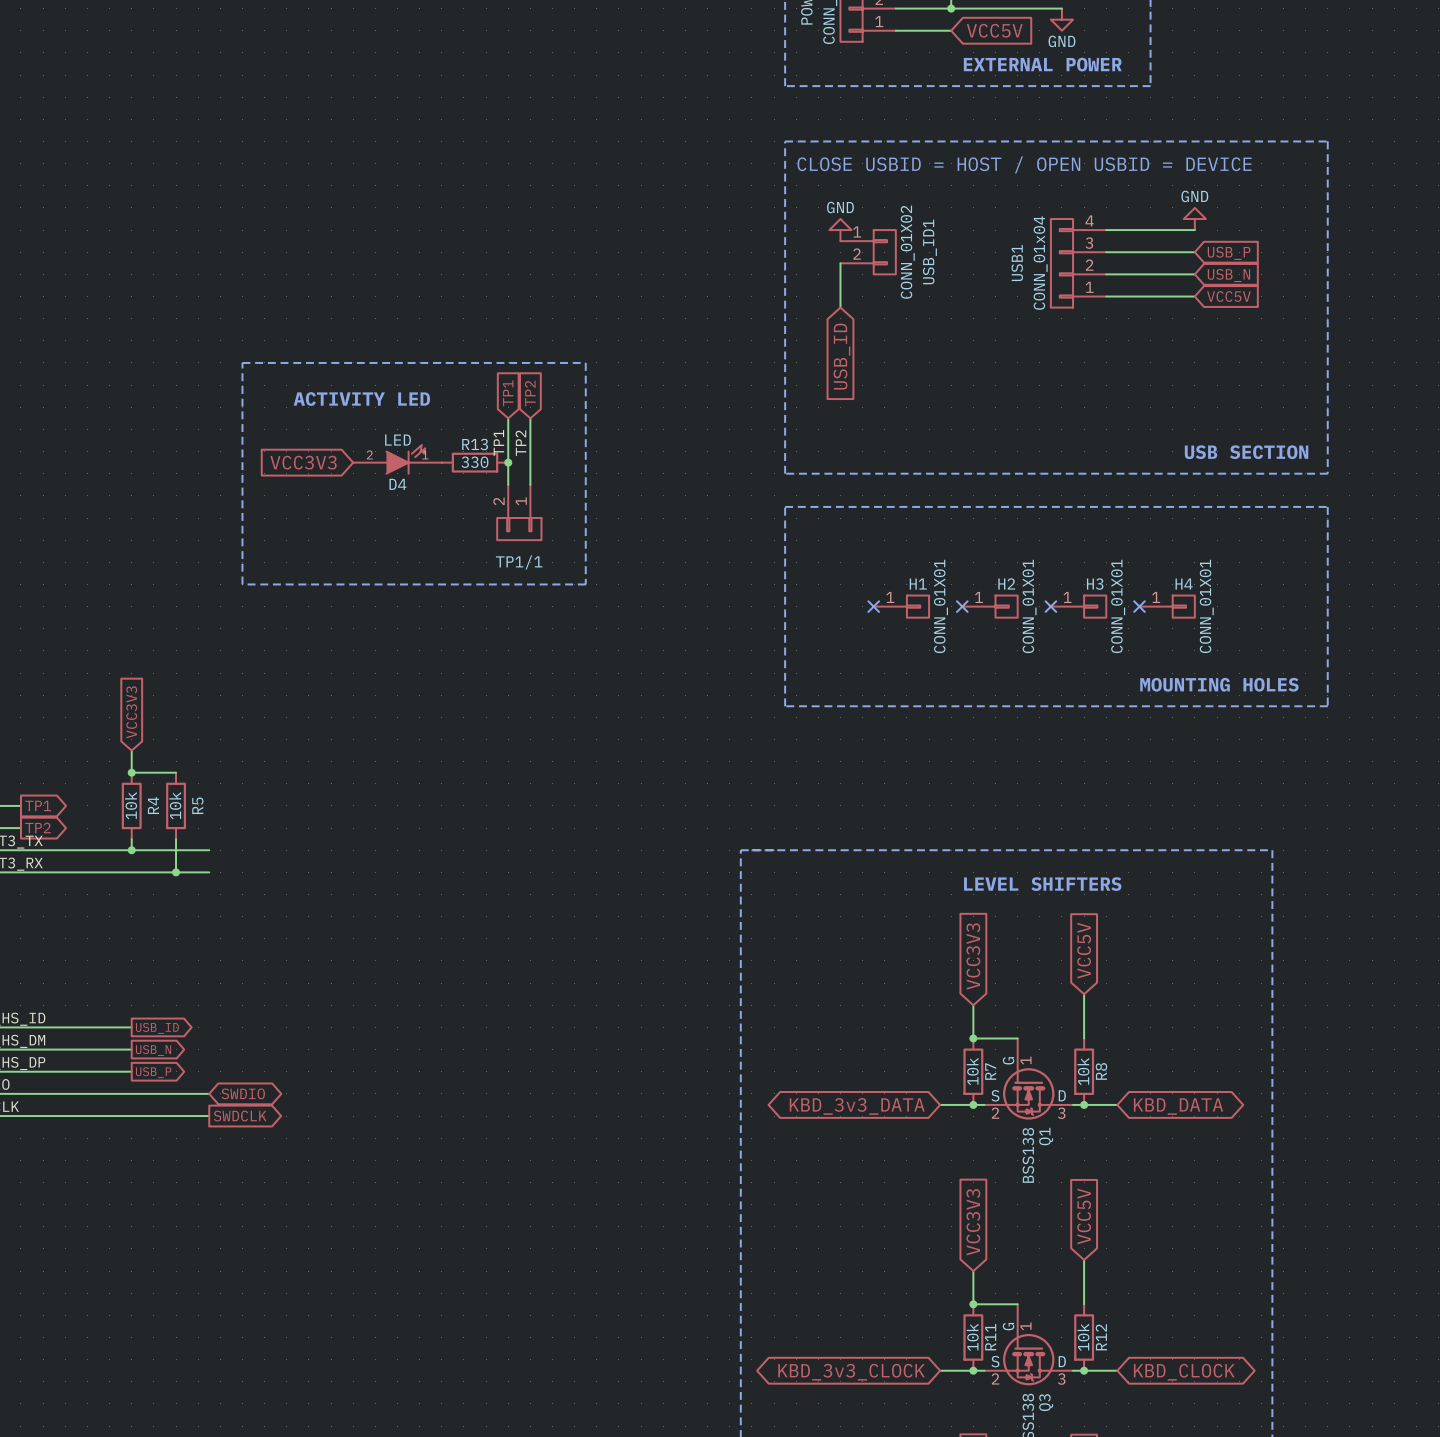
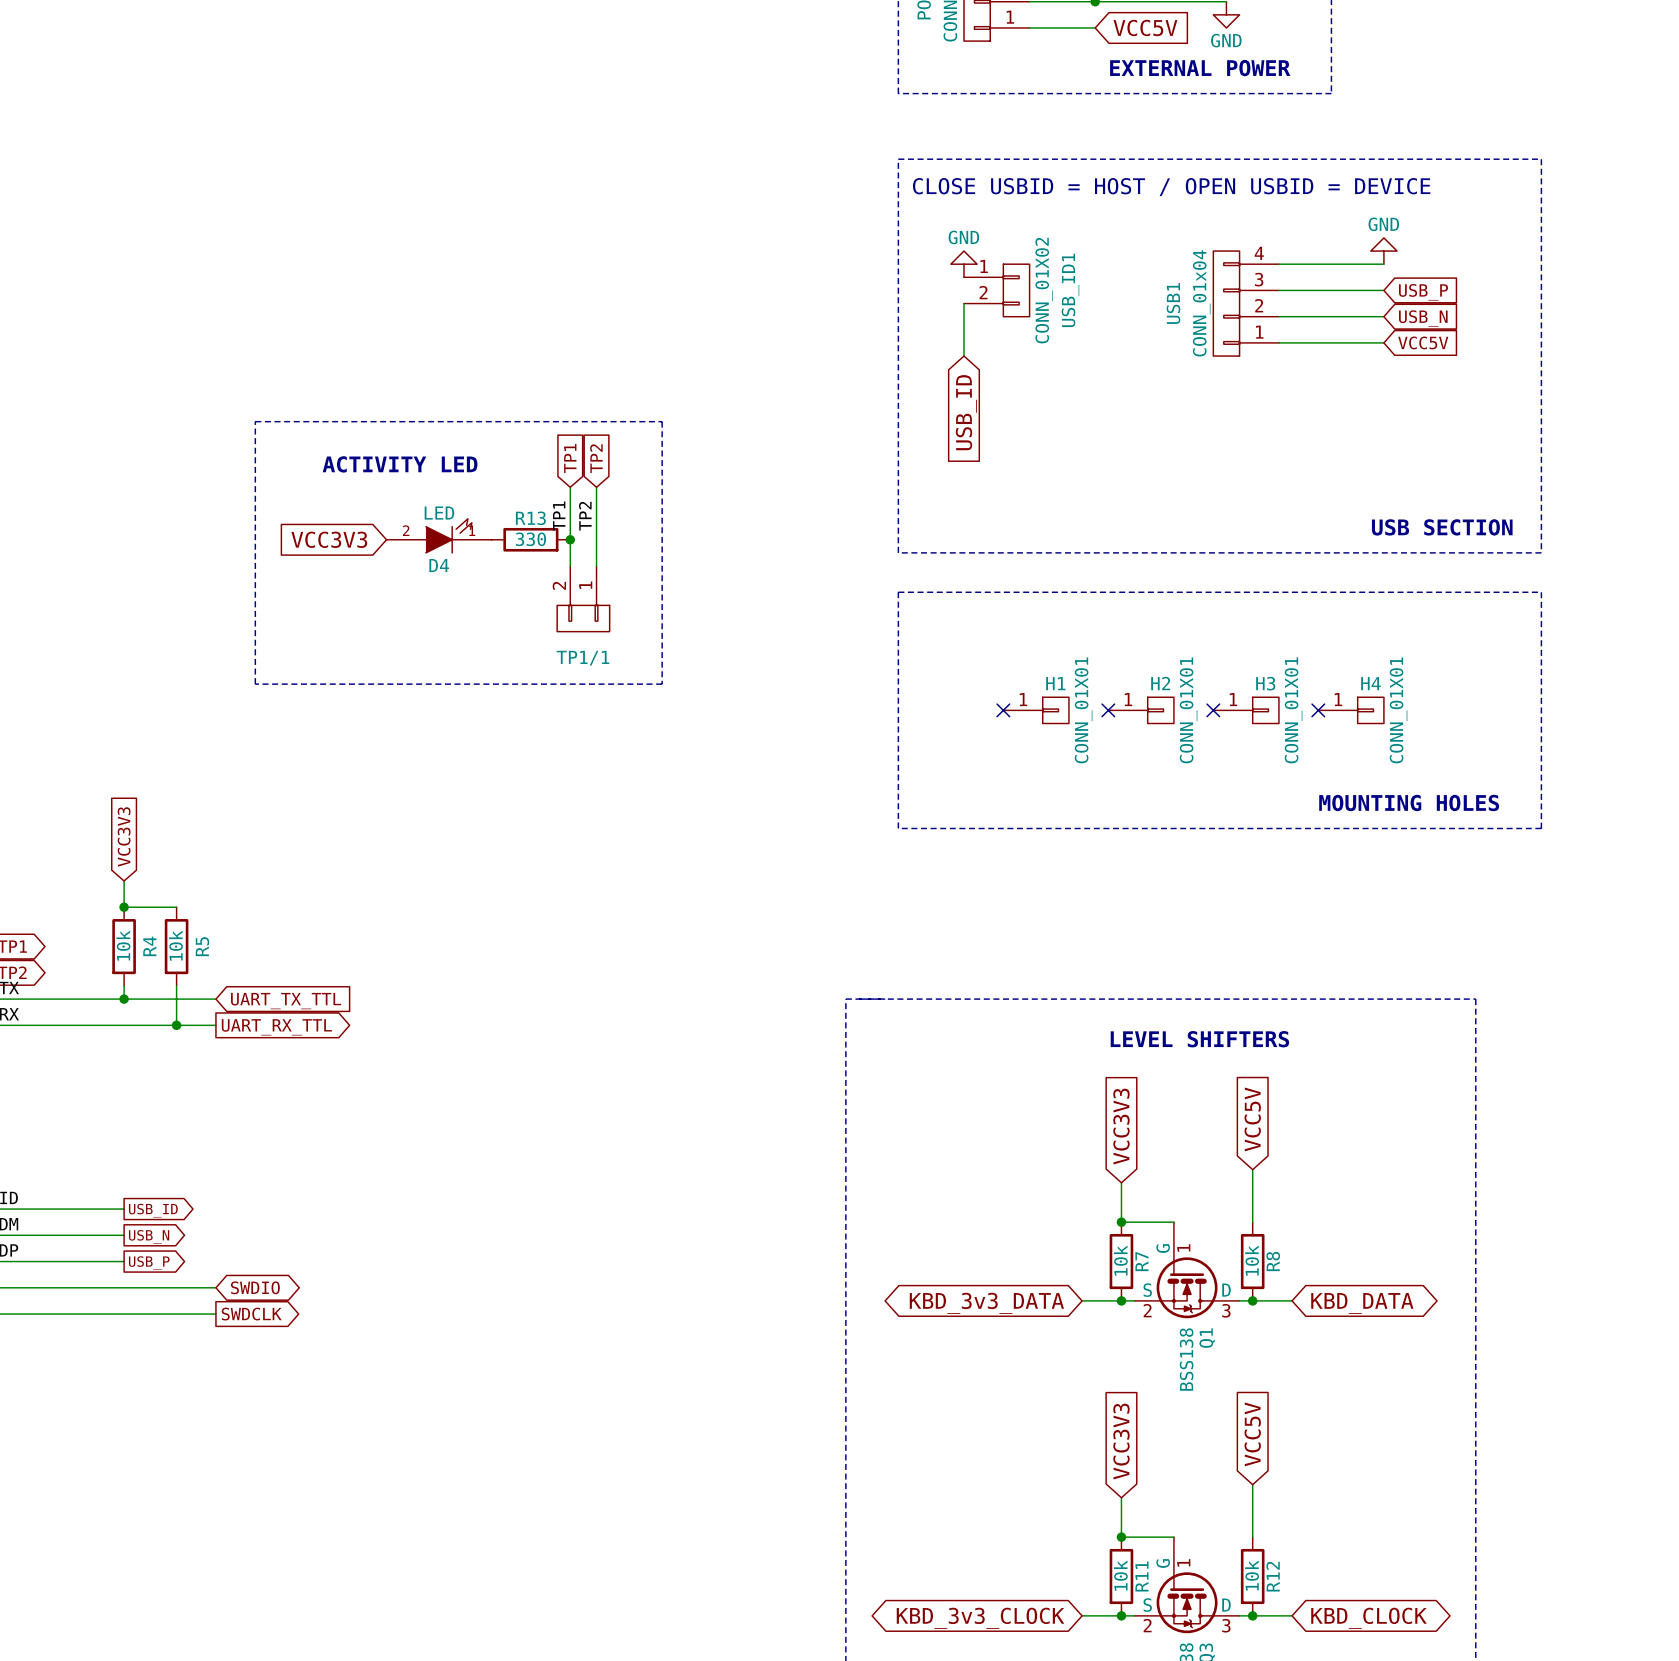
global label: none -> UART_TX_TTL (286, 1001)
global label: none -> UART_RX_TTL (276, 1027)

